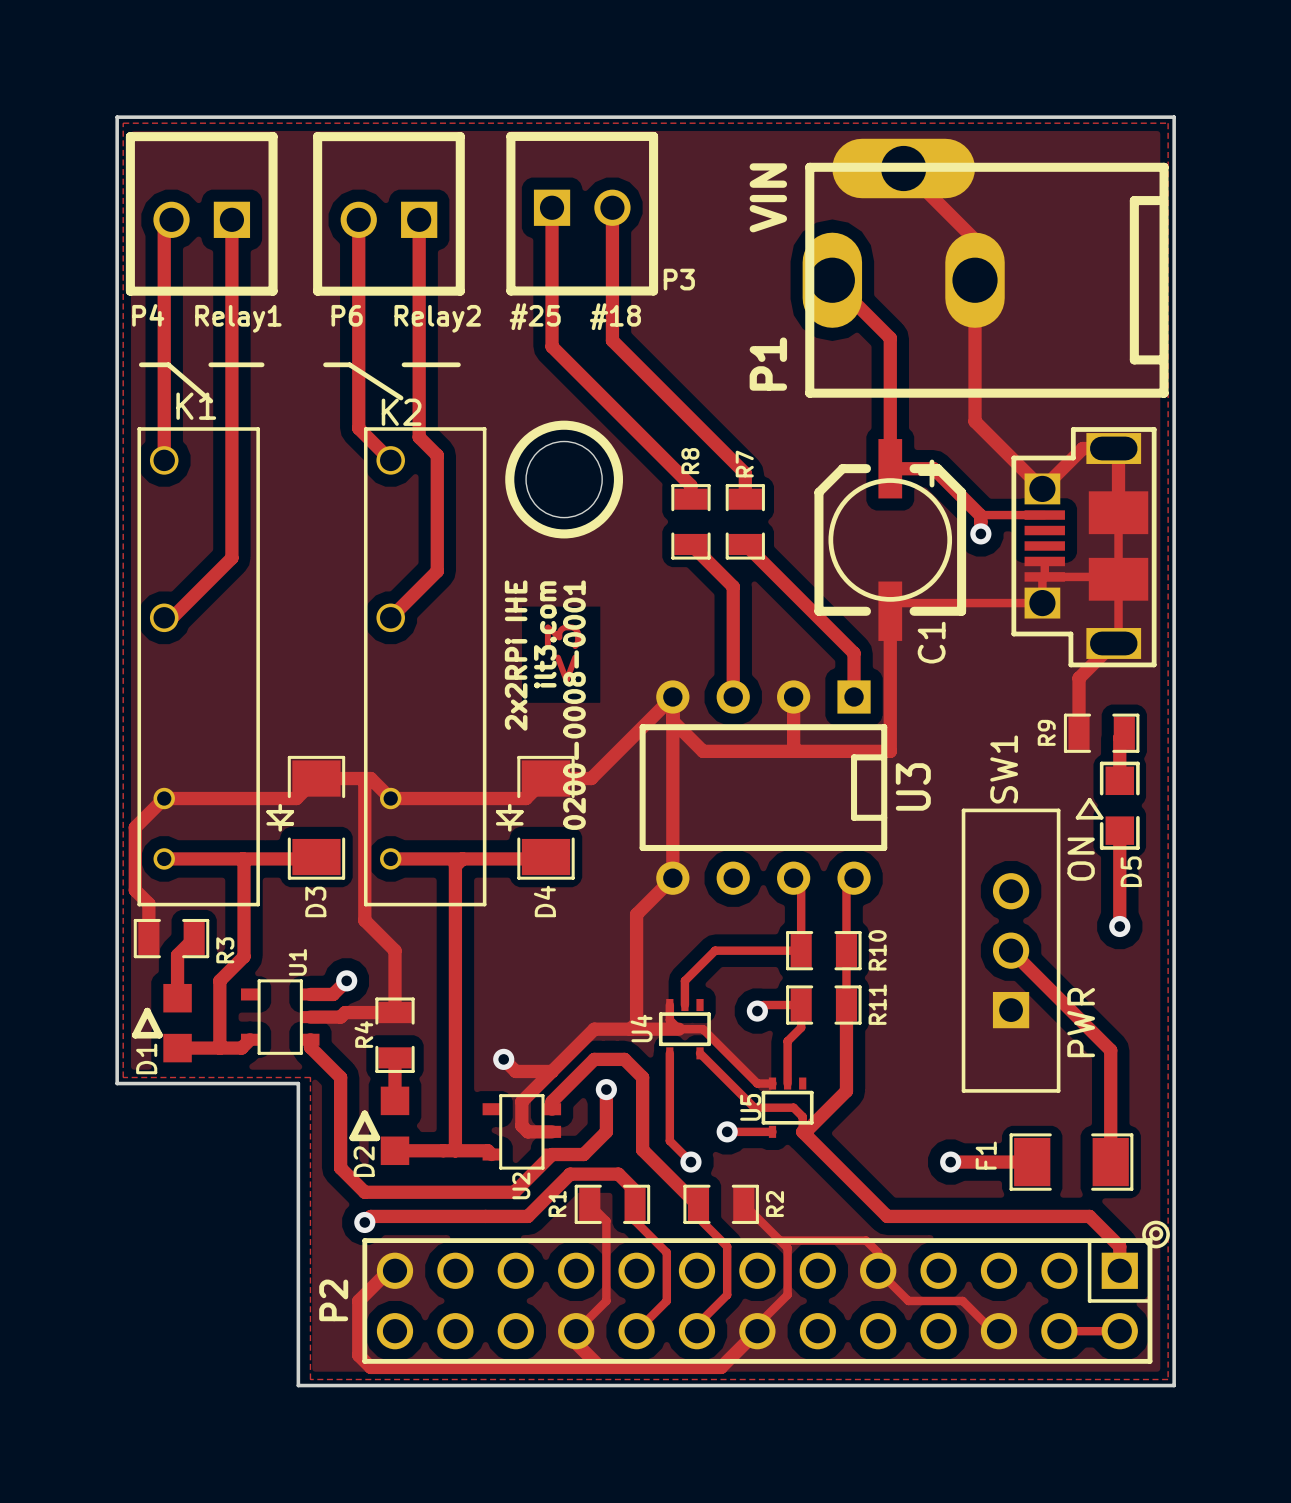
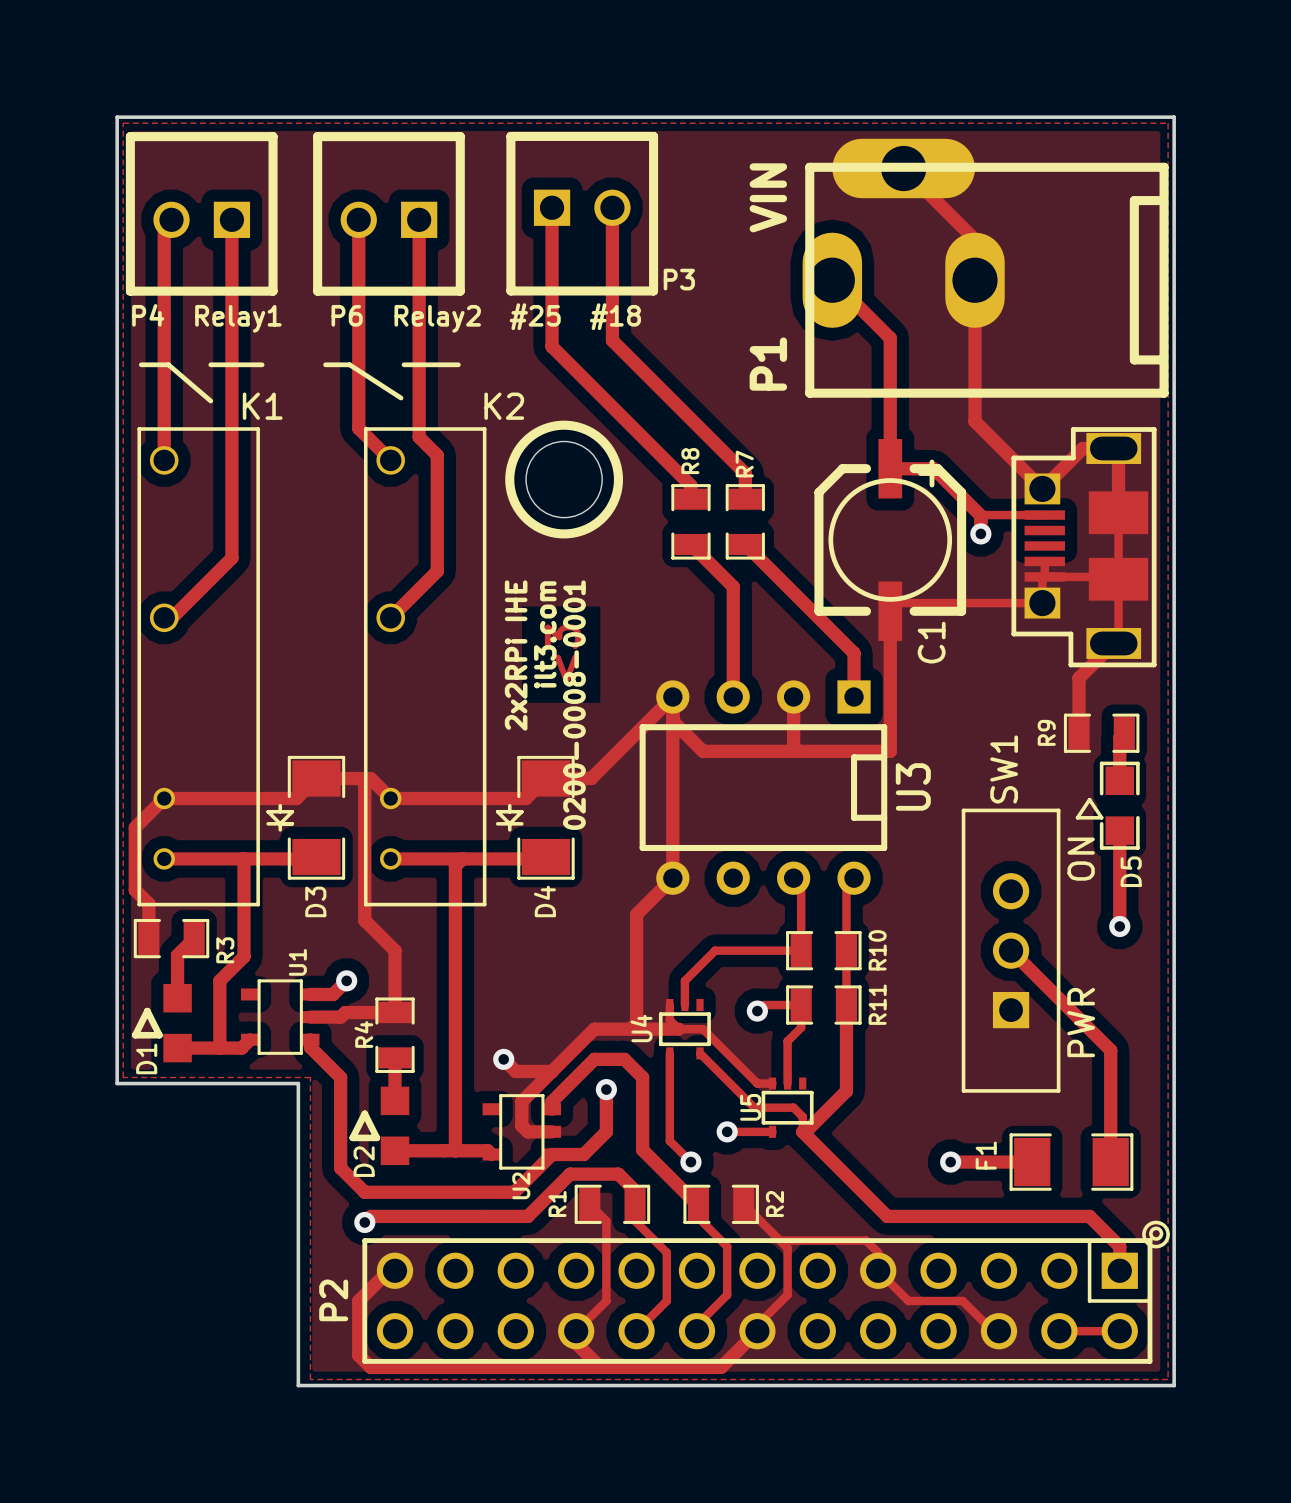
K1 name position: K1 (196, 406) -> K1 (262, 406)
K2 name position: K2 (401, 412) -> K2 (504, 406)

